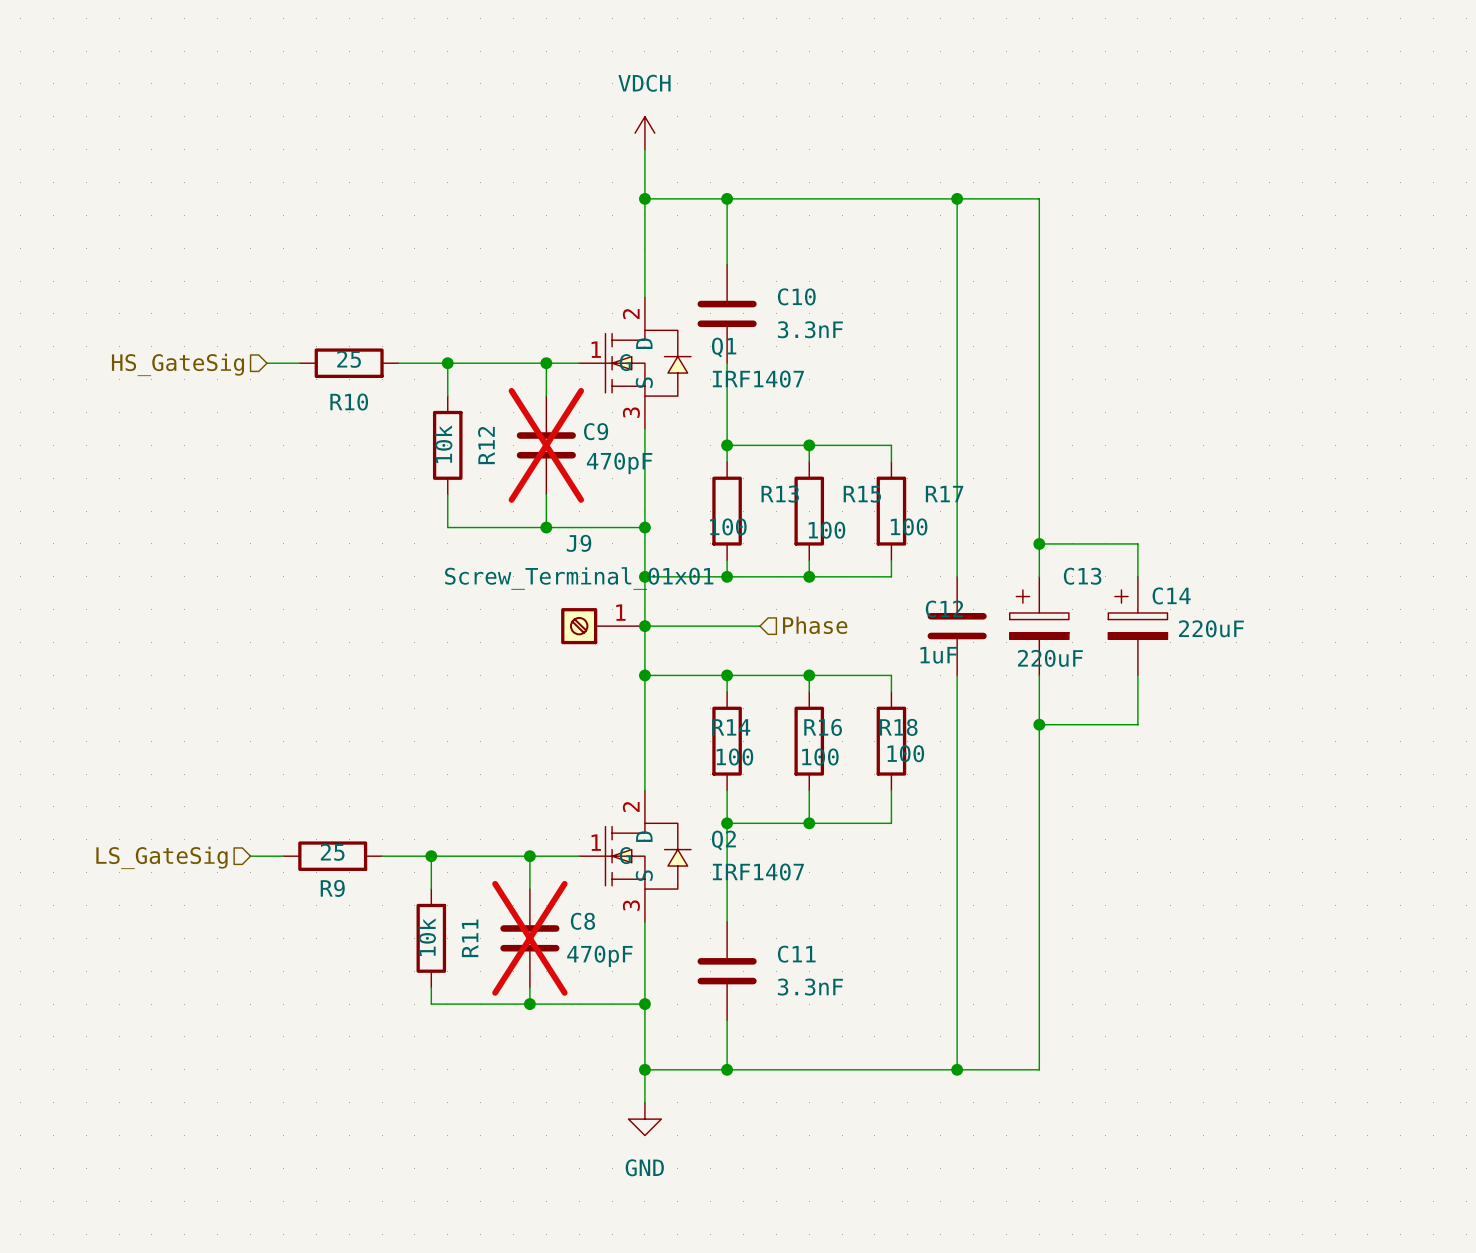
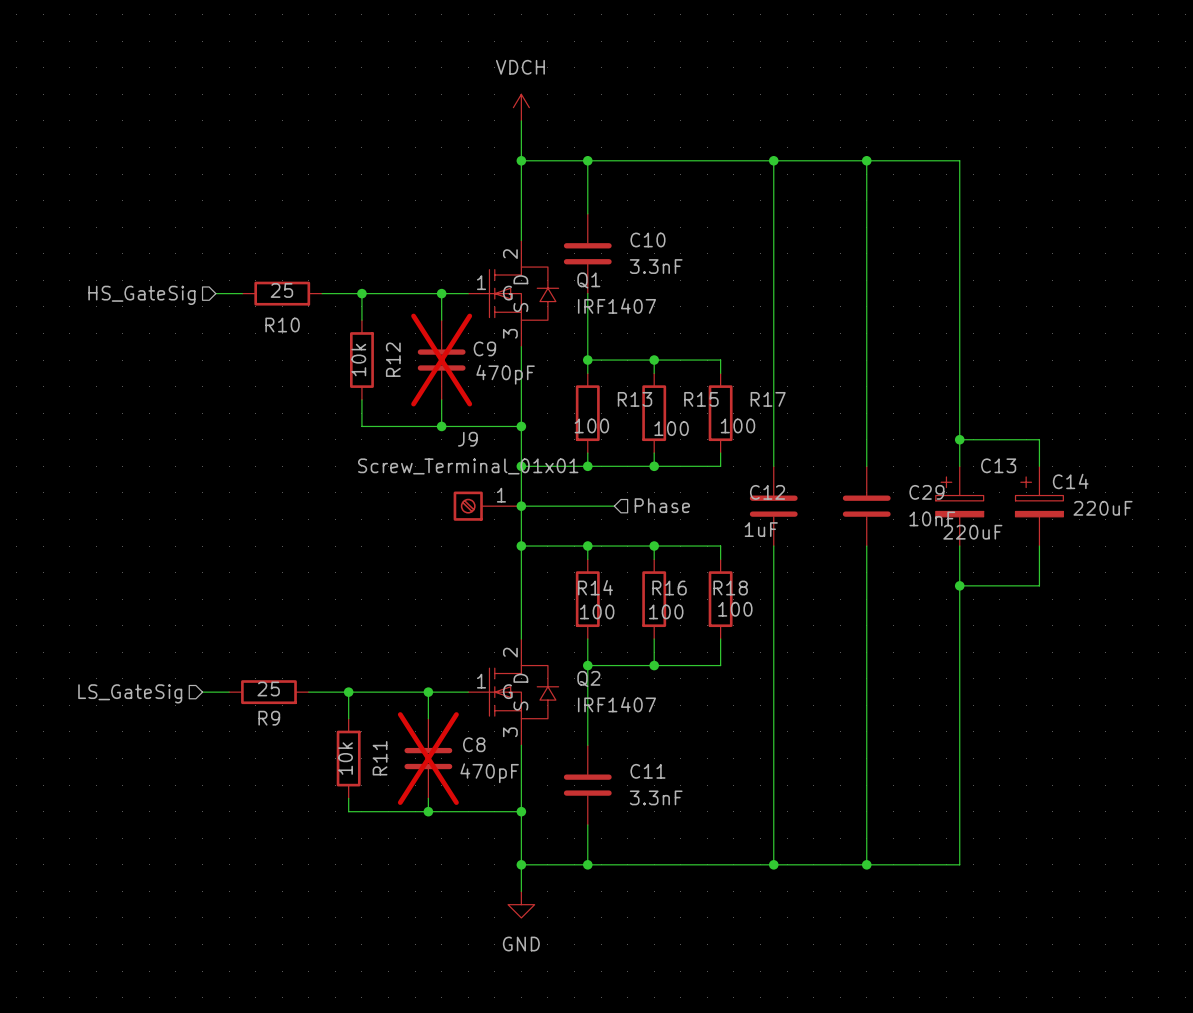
wire: (1039, 198) (1039, 576) -> (840, 160) (959, 160) (959, 466)
wire: none -> (866, 160) (866, 466)
junction: none -> (866, 160)
wire: (1039, 543) (1137, 543) (1137, 576) -> (959, 439) (1039, 439) (1039, 466)
junction: (1039, 543) -> none
junction: none -> (959, 439)
C13 position: (1039, 626) -> (959, 506)
C29: none -> 10nF (866, 506)
C14 position: (1137, 626) -> (1039, 506)
wire: (1039, 675) (1039, 1069) -> (959, 546) (959, 864) (840, 864)
wire: none -> (866, 546) (866, 864)
wire: (1137, 675) (1137, 724) (1039, 724) -> (1039, 546) (1039, 585) (959, 585)
junction: (1039, 724) -> none
junction: none -> (959, 585)
junction: none -> (866, 864)

